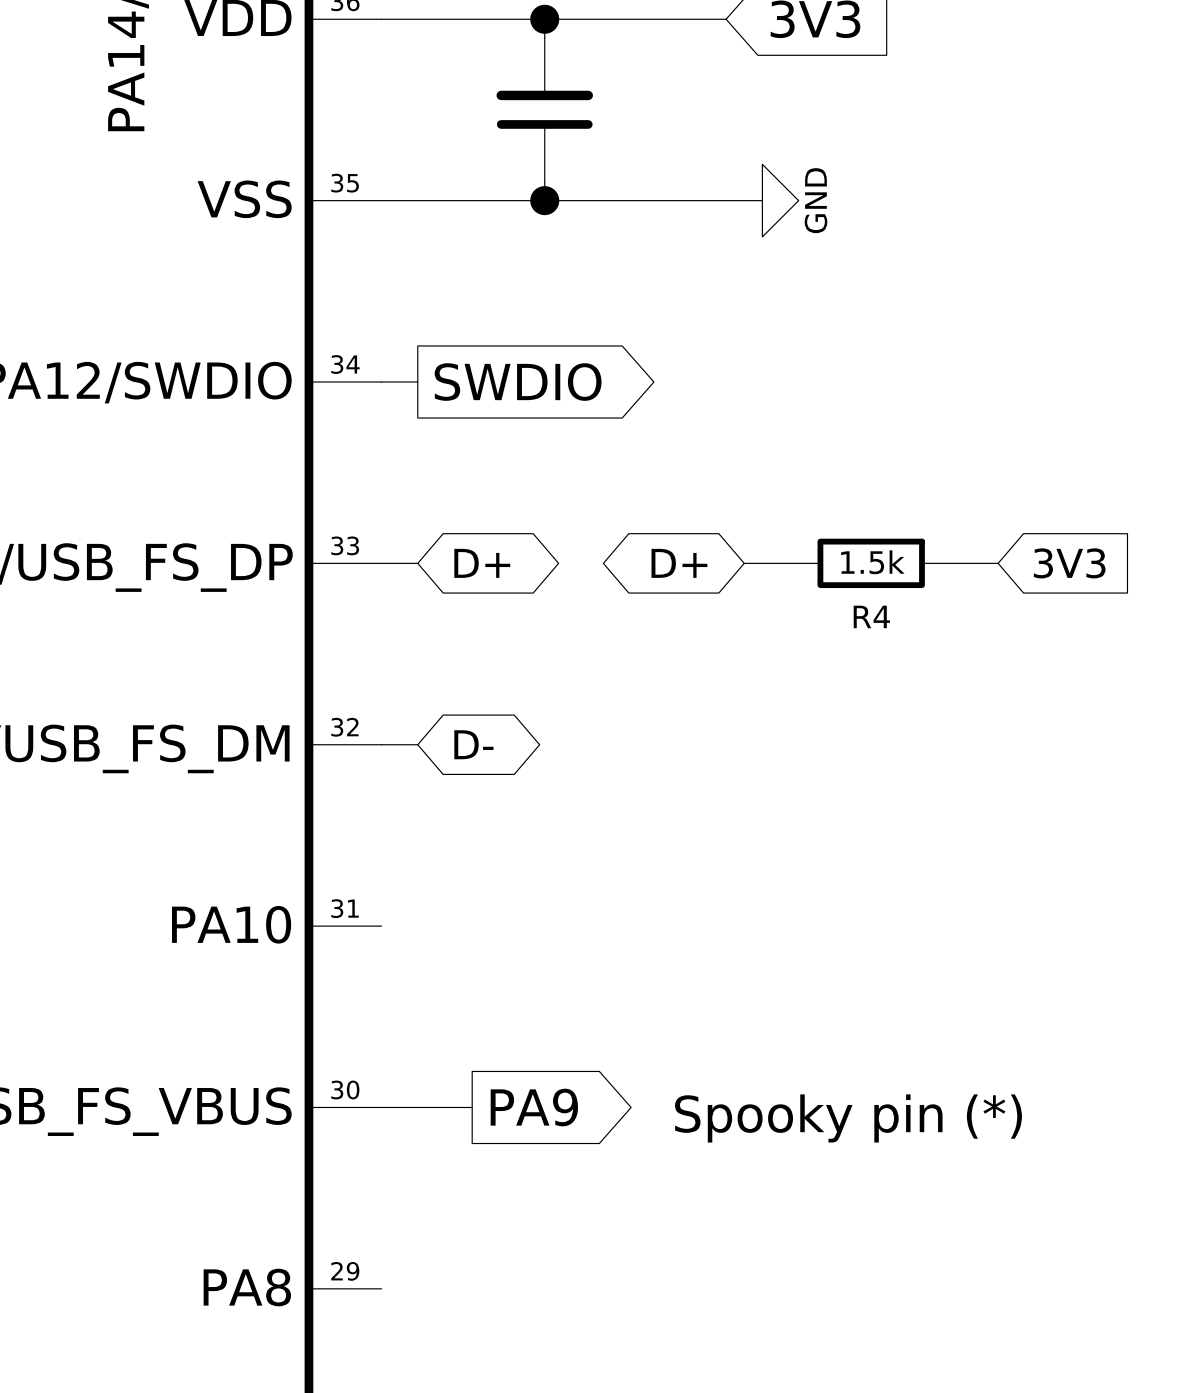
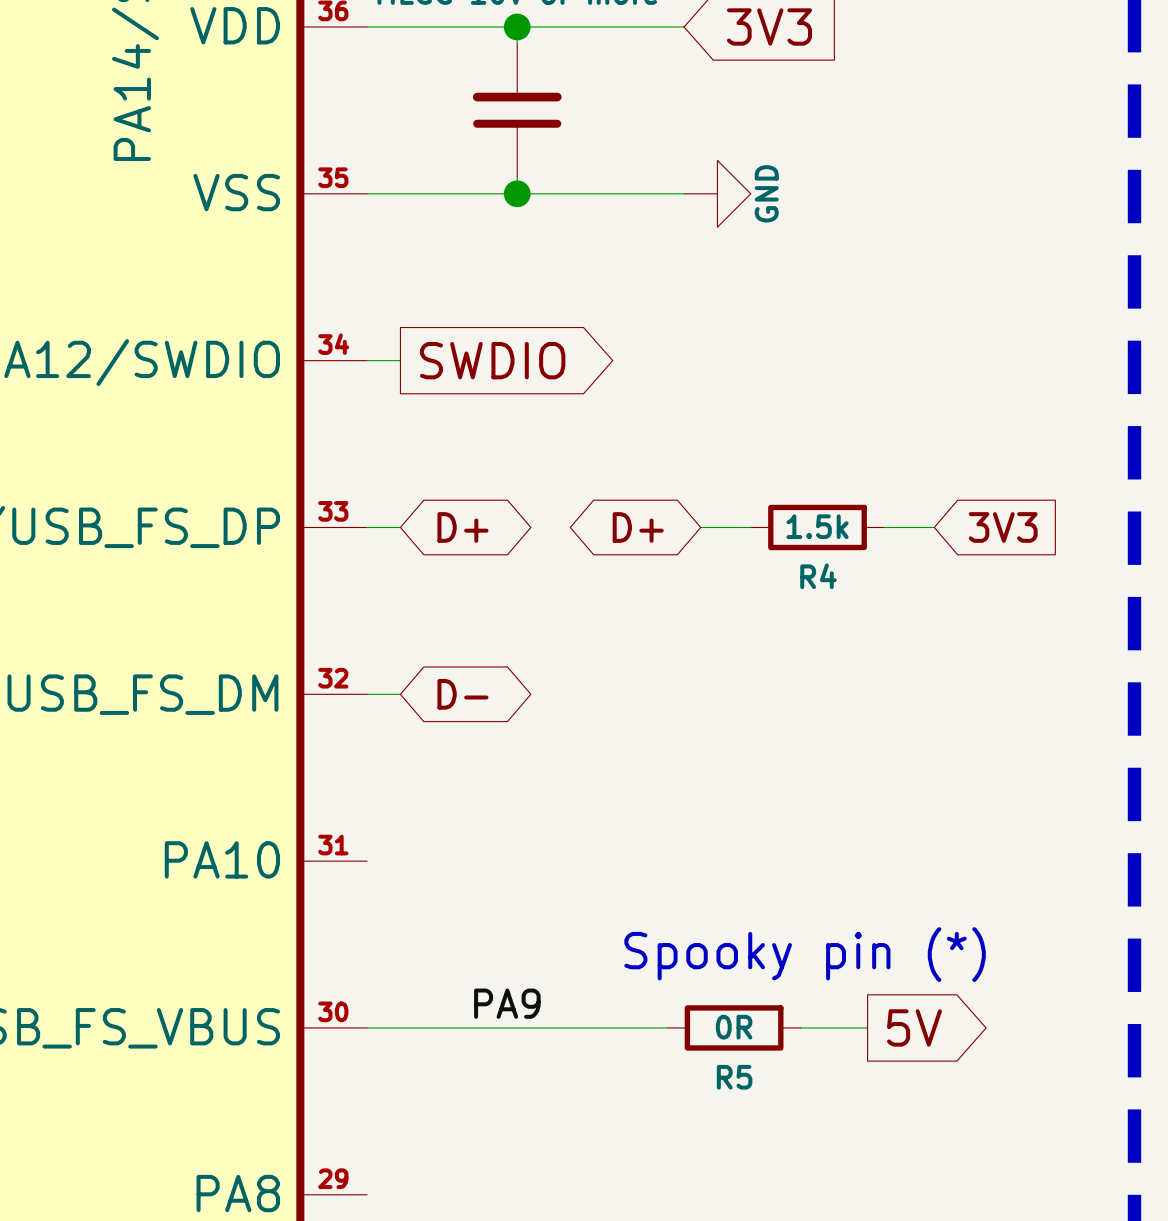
label: none -> PA9 (507, 1003)
wire: none -> (450, 1027) (667, 1027)
global label: PA9 (534, 1107) -> none
R5: none -> 0R (734, 1027)
wire: none -> (800, 1027) (867, 1027)
global label: none -> 5V (914, 1027)
text position: Spooky pin (*) (848, 1118) -> Spooky pin (*) (805, 954)

